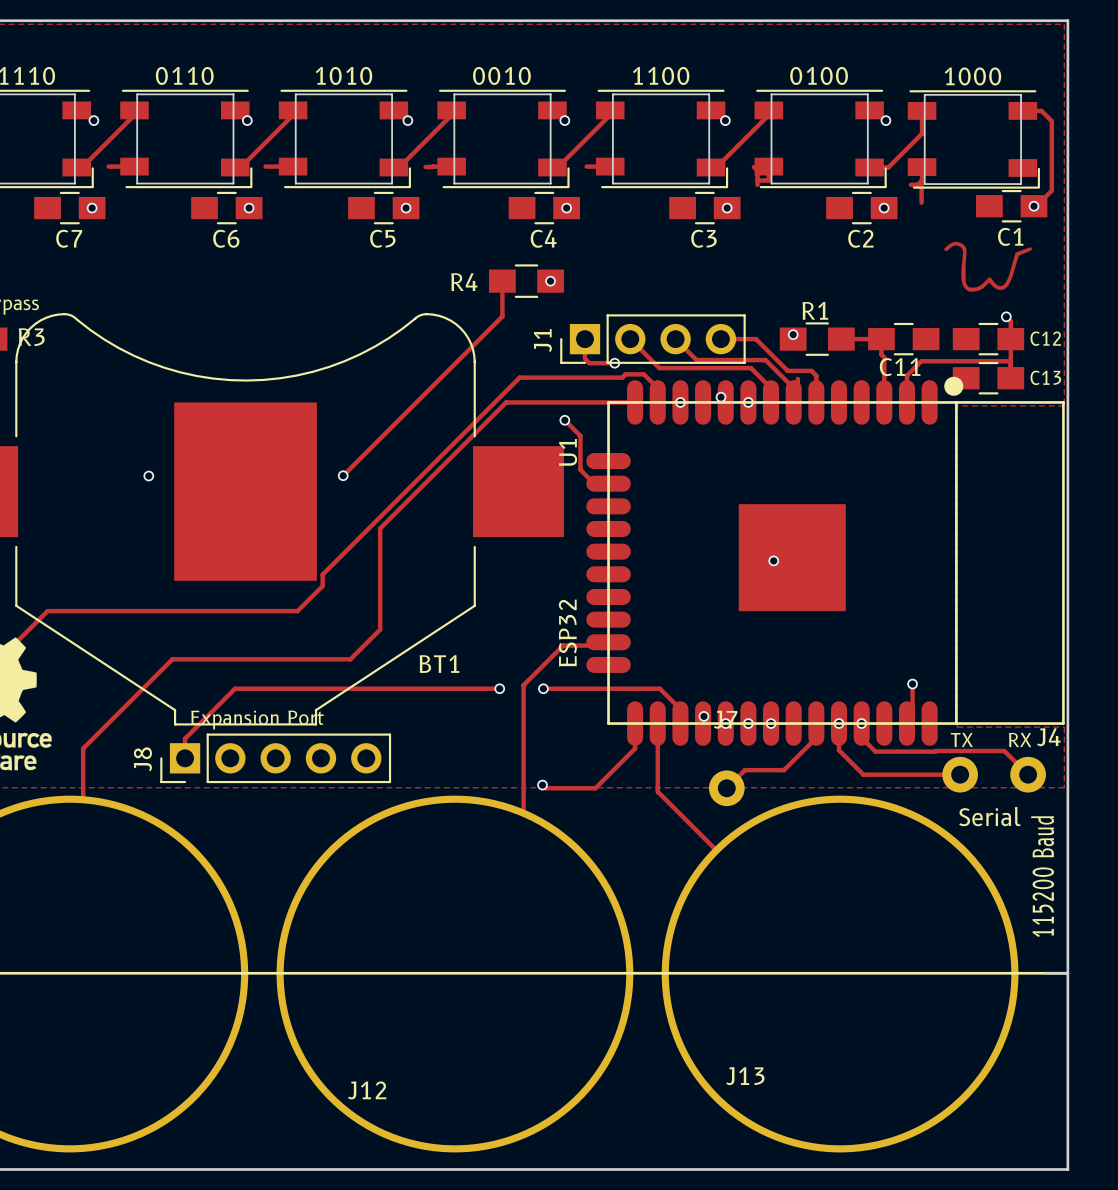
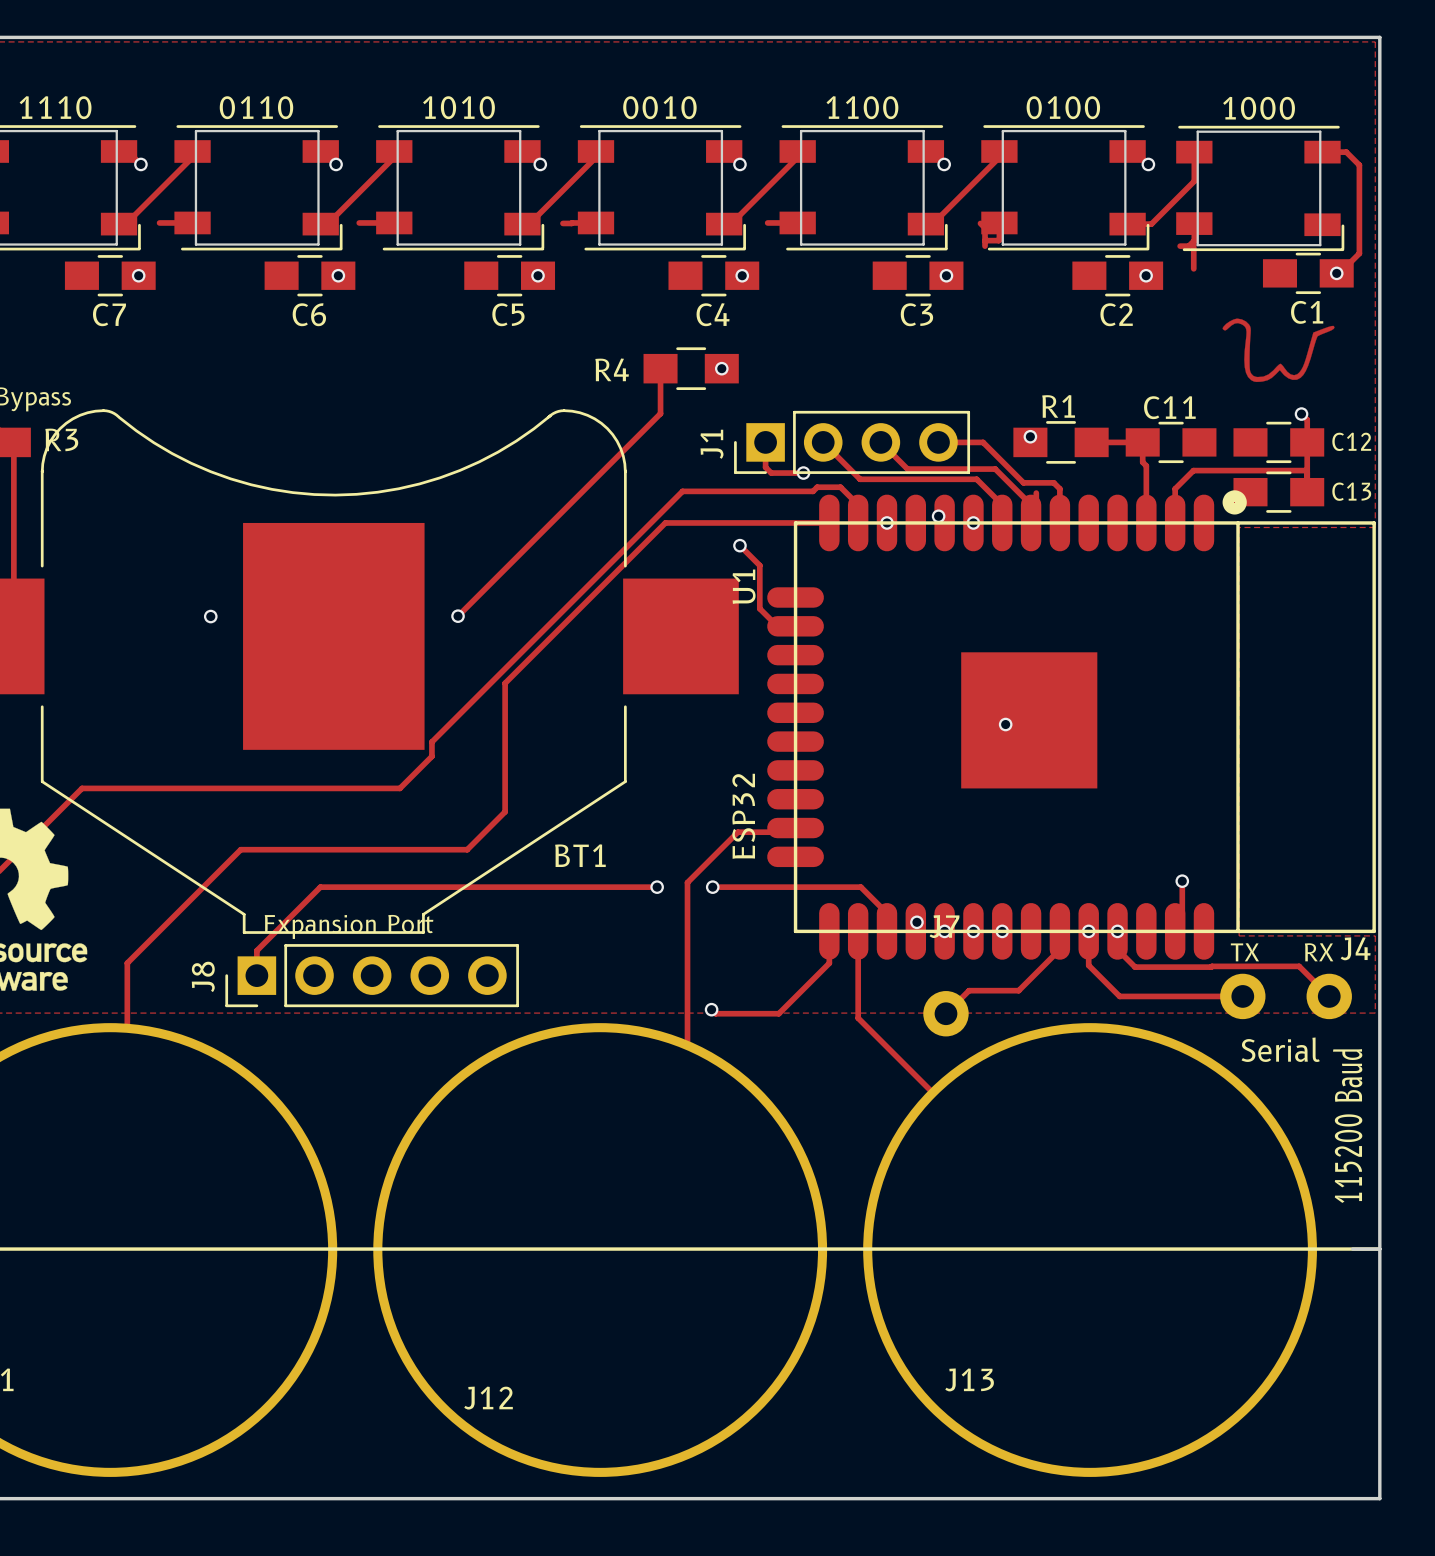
C11 name position: C11 (900, 367) -> C11 (1169, 407)

